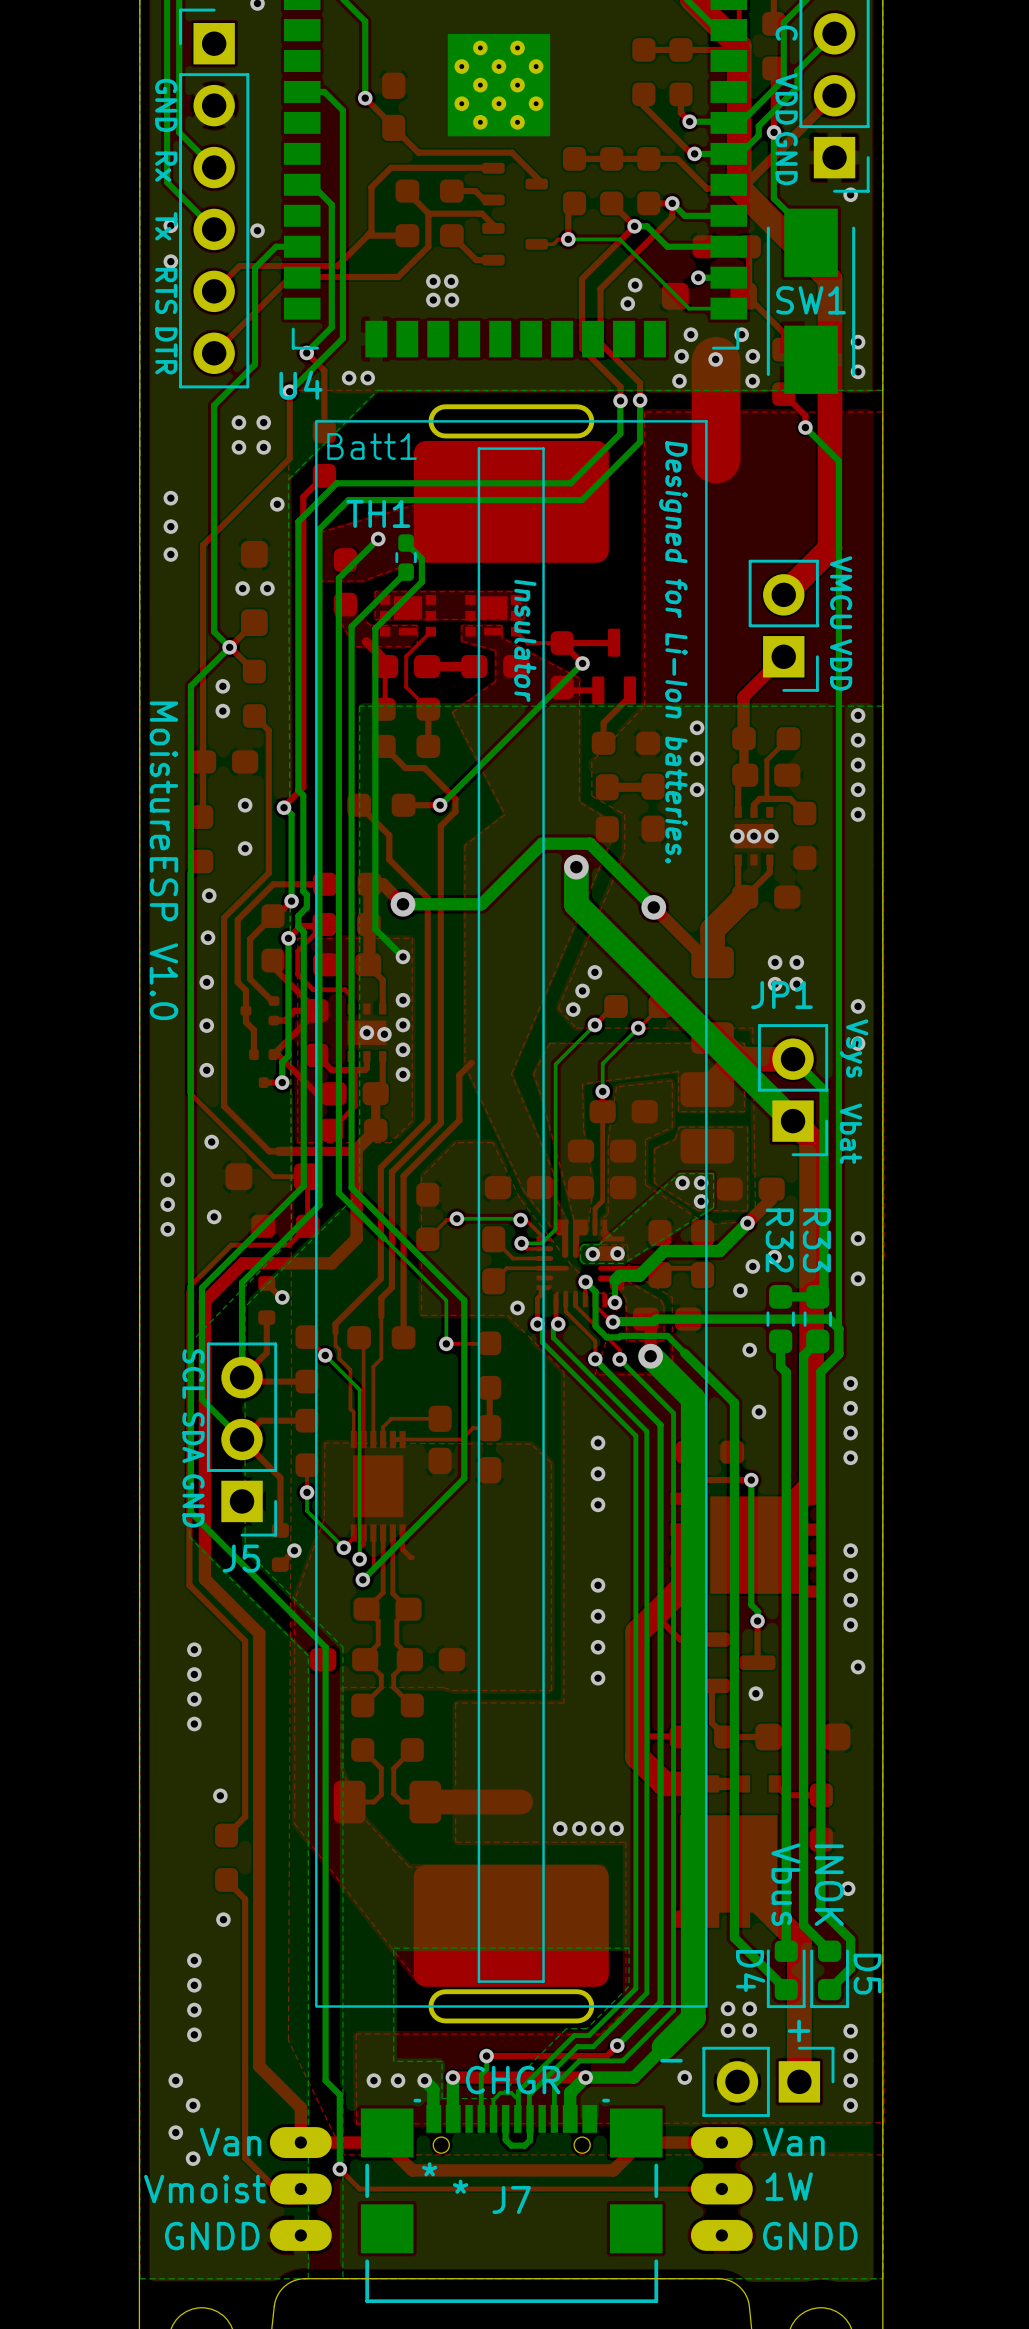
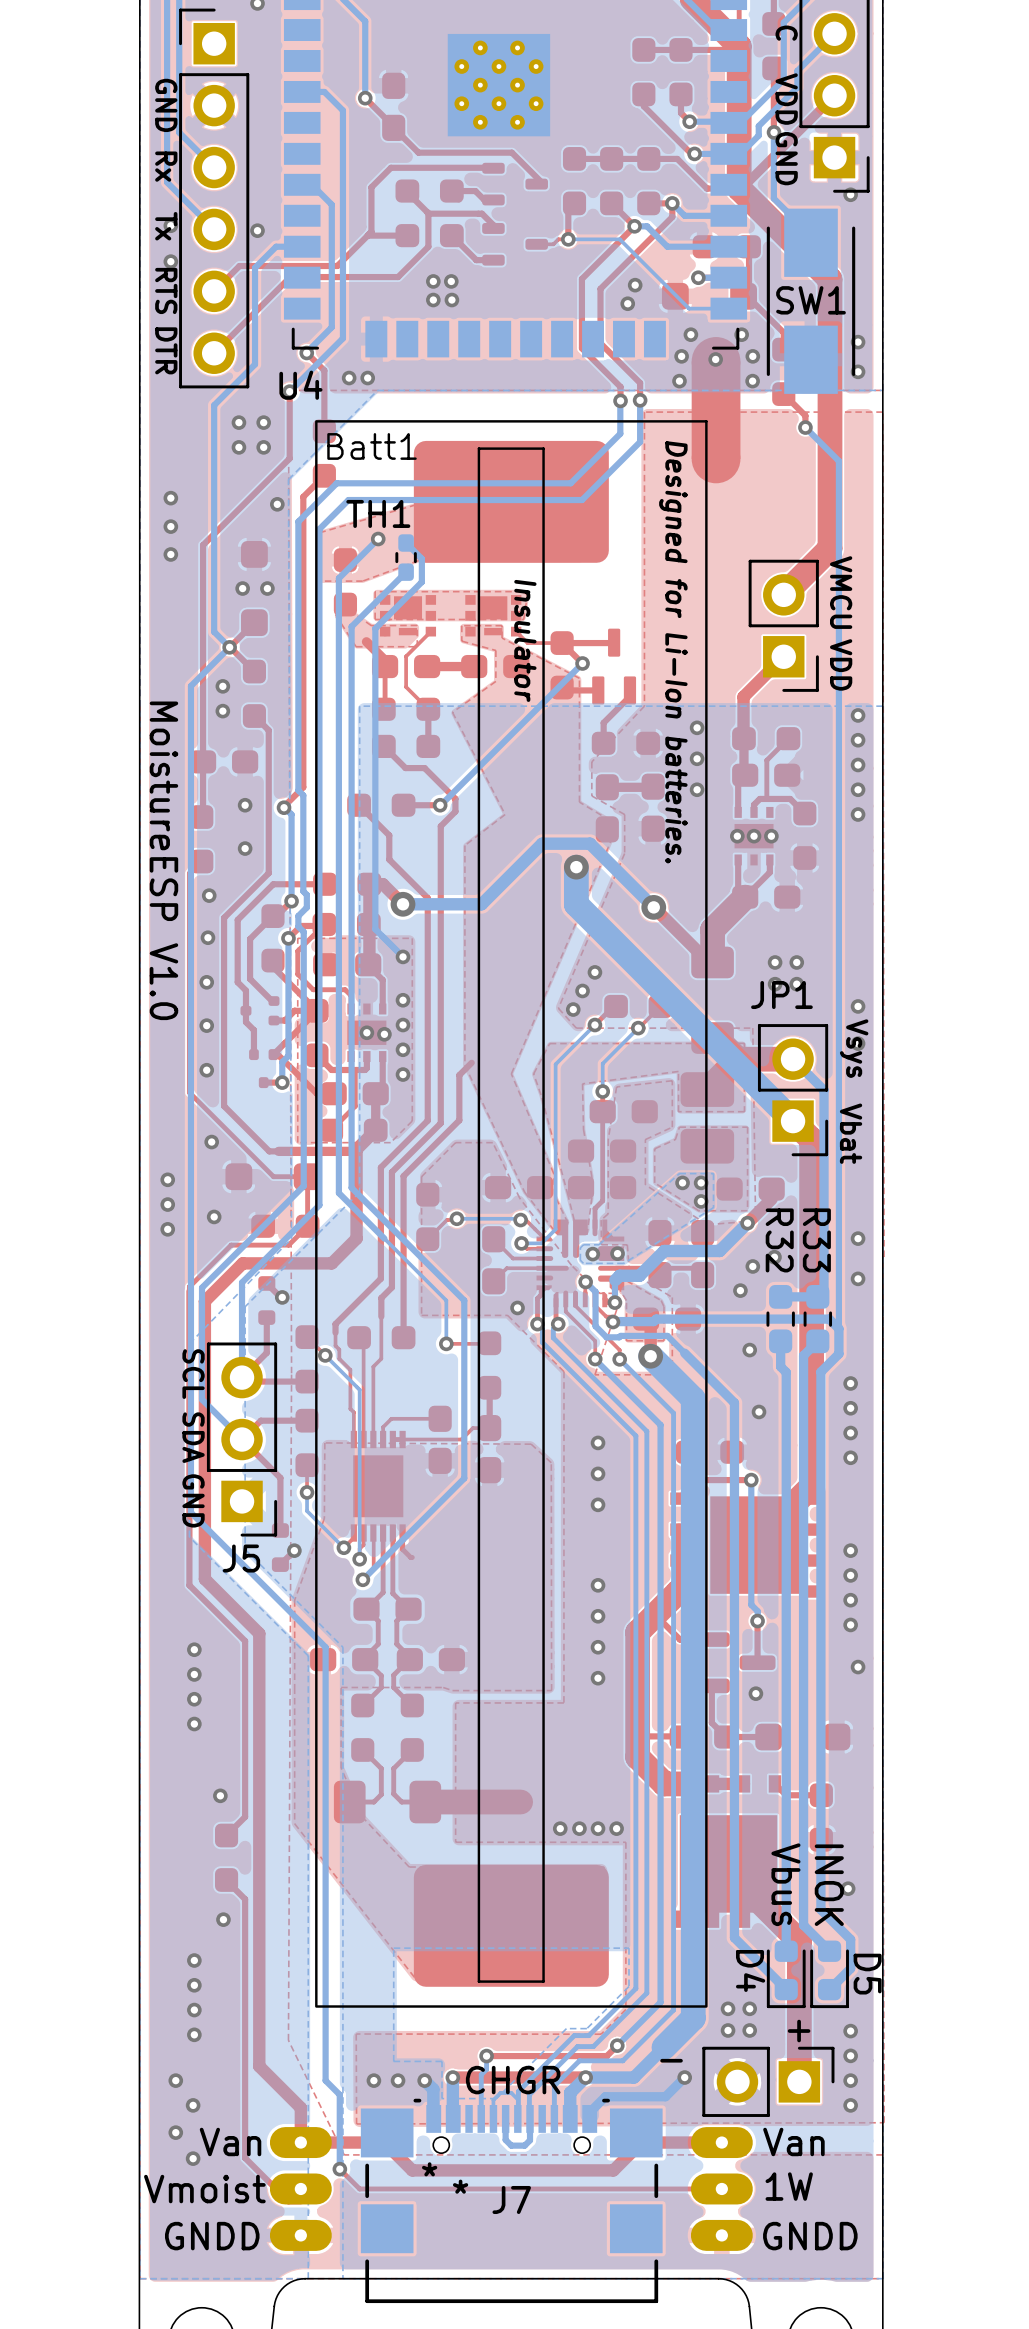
Batt1 footprint: [315, 404, 708, 2024] -> [315, 409, 708, 2019]
bottom track: none -> (684, 2077) (665, 2096) (605, 2096) (589, 2112) (589, 2118)

